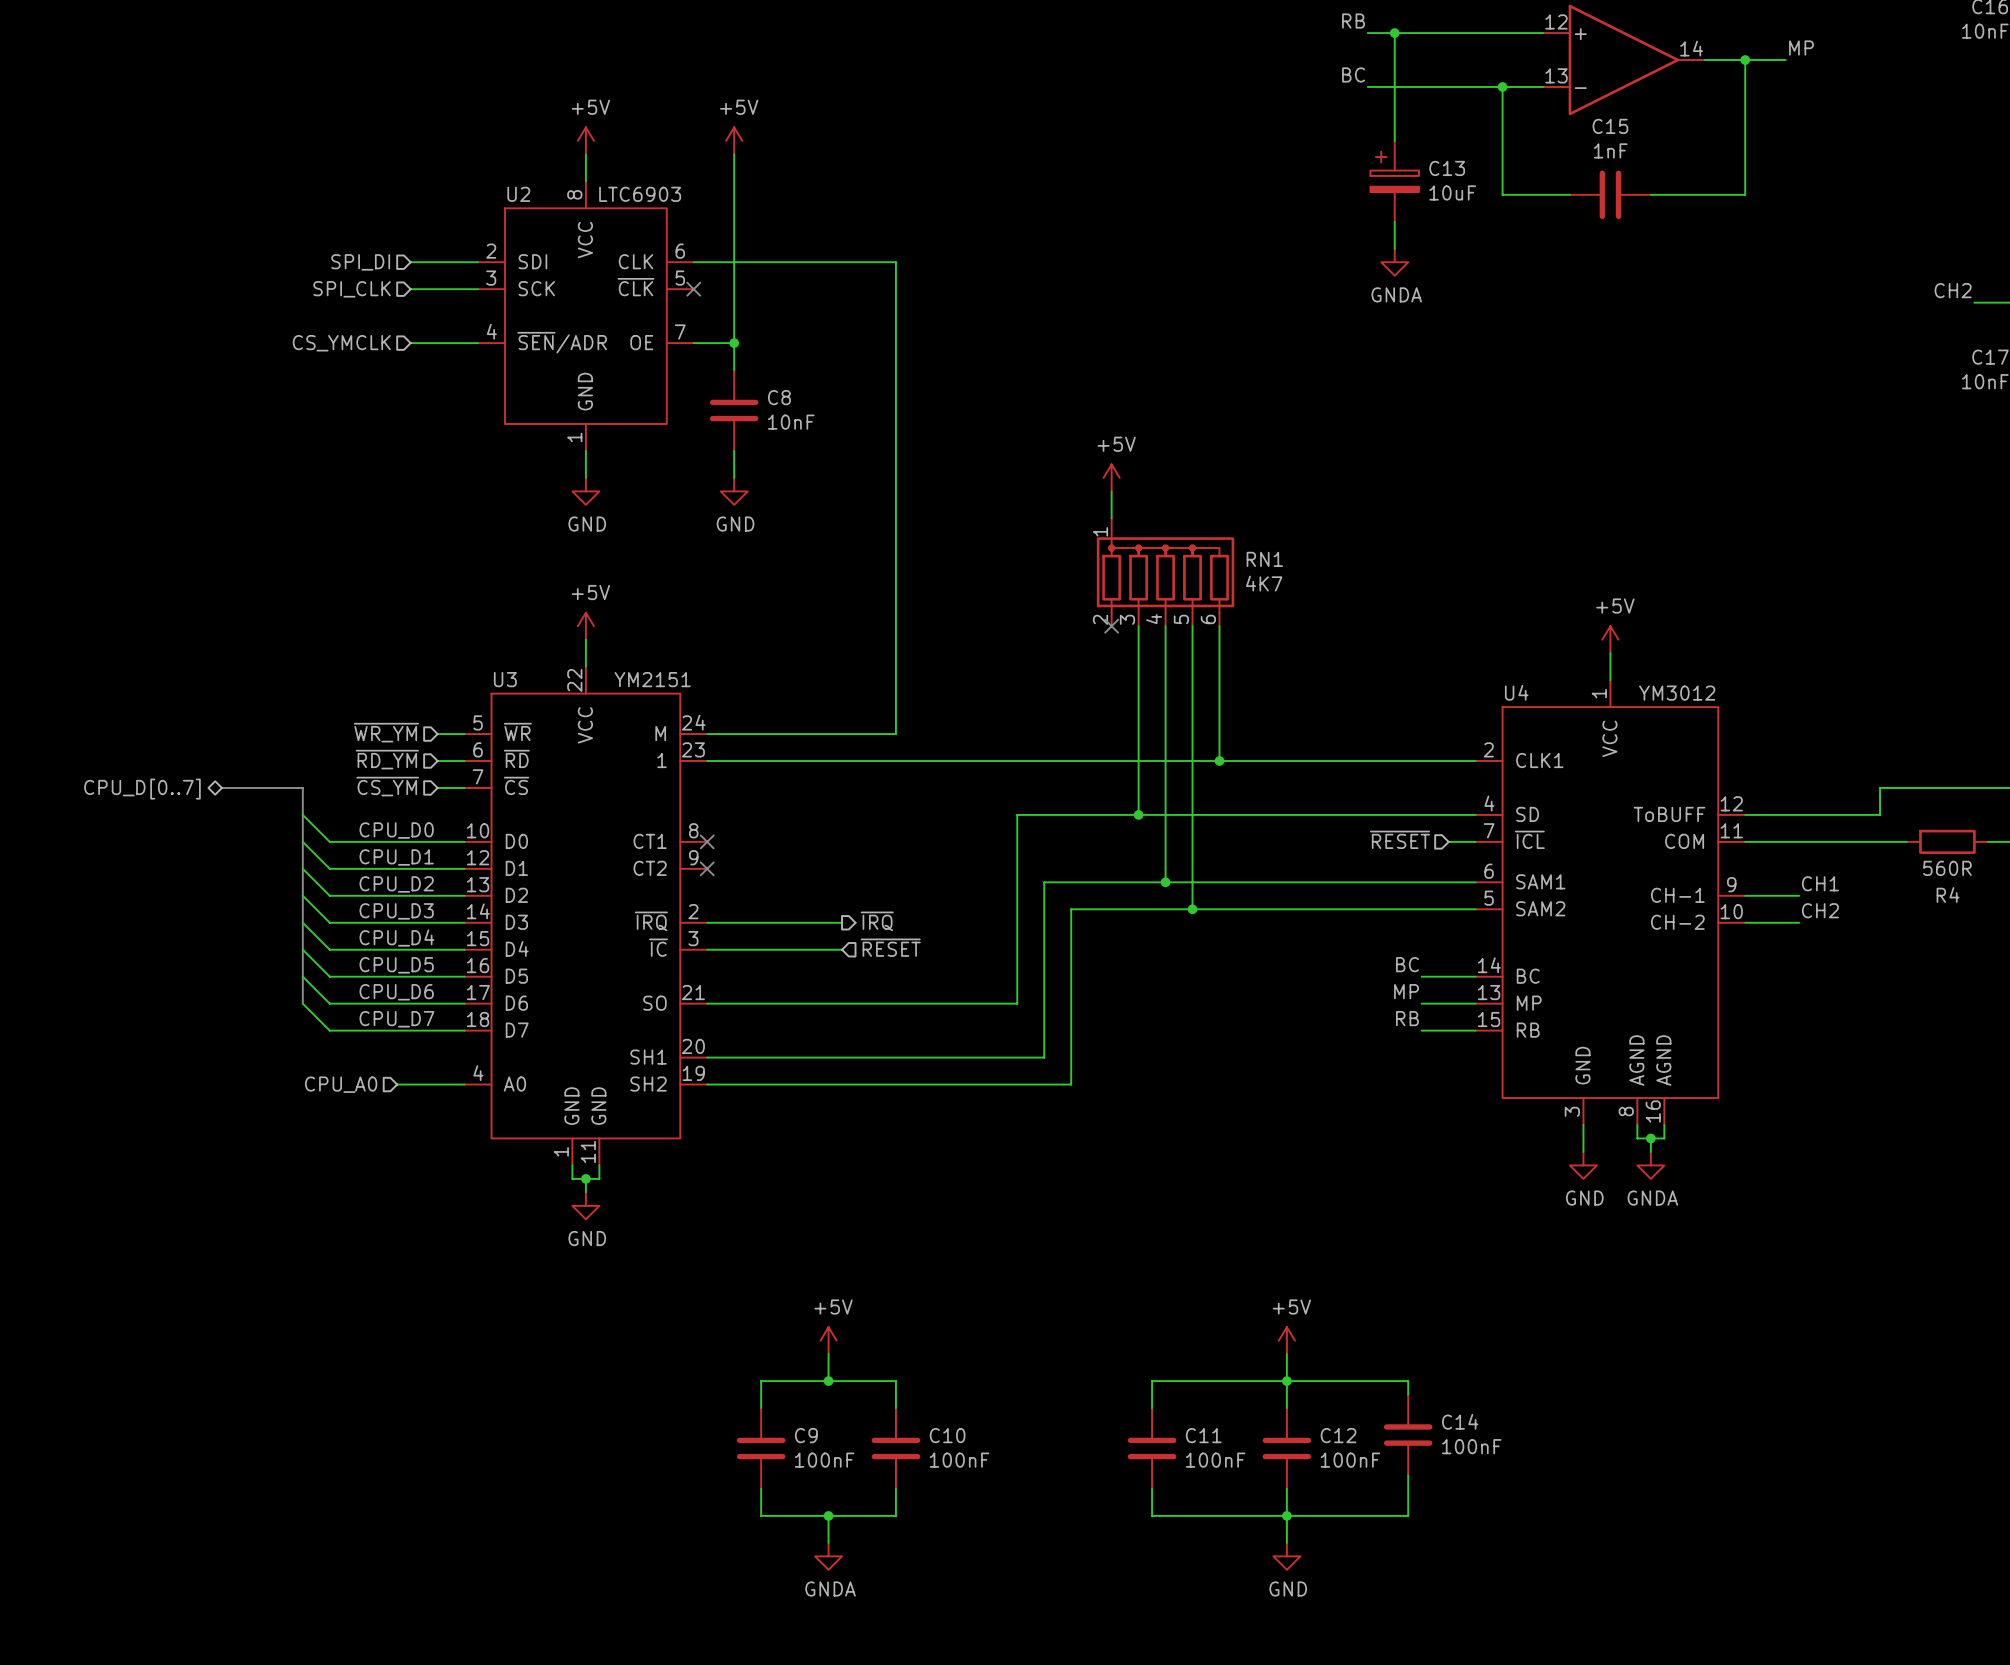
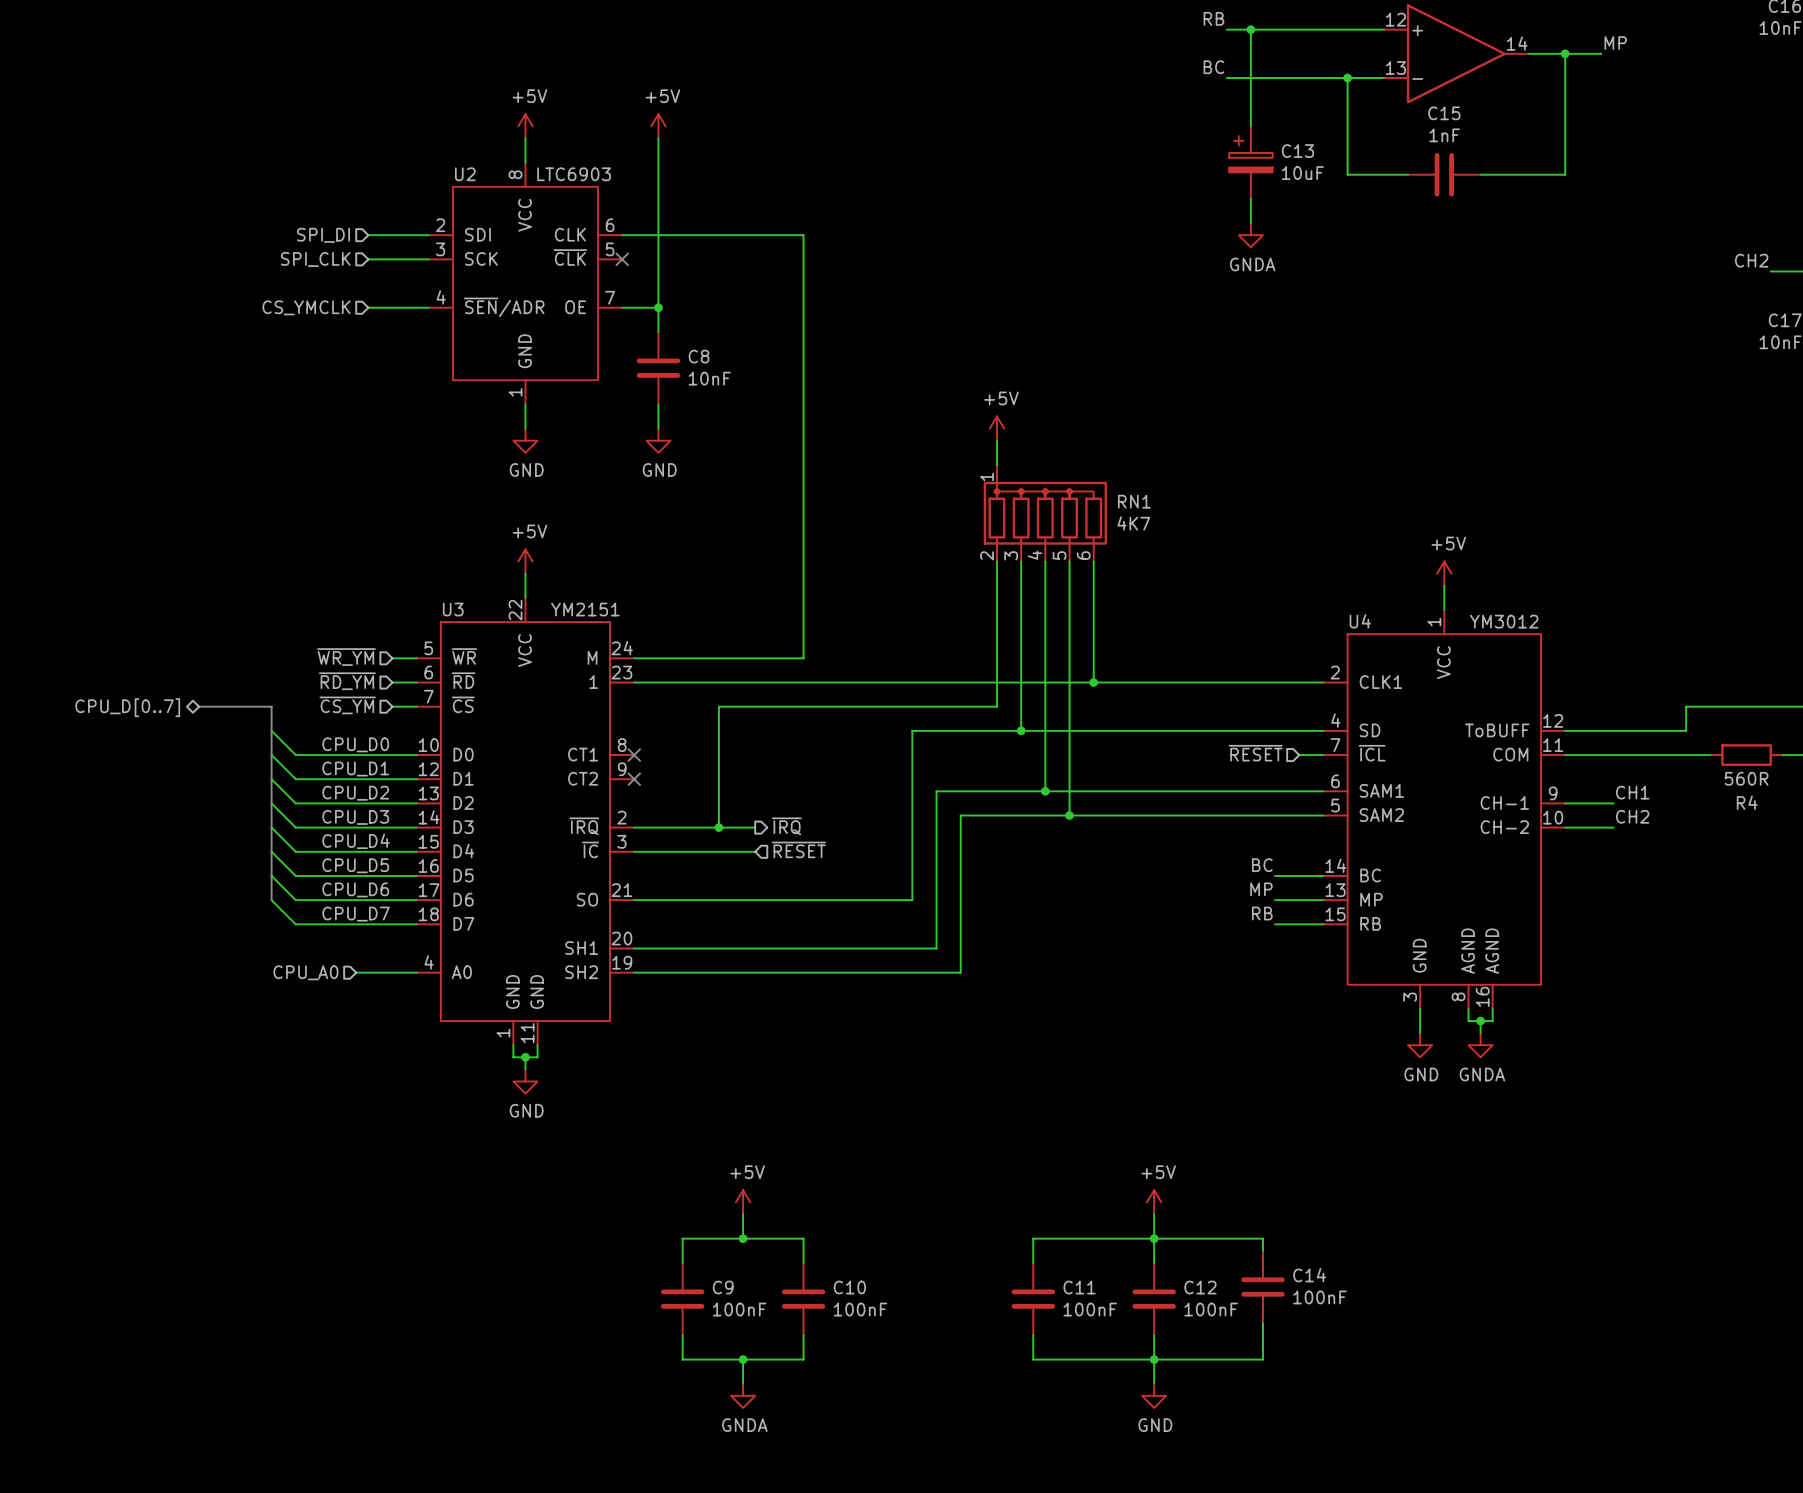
wire: none -> (996, 561) (996, 706) (718, 706) (718, 827)
no-connect mark: (1111, 626) -> none
junction: none -> (718, 827)

